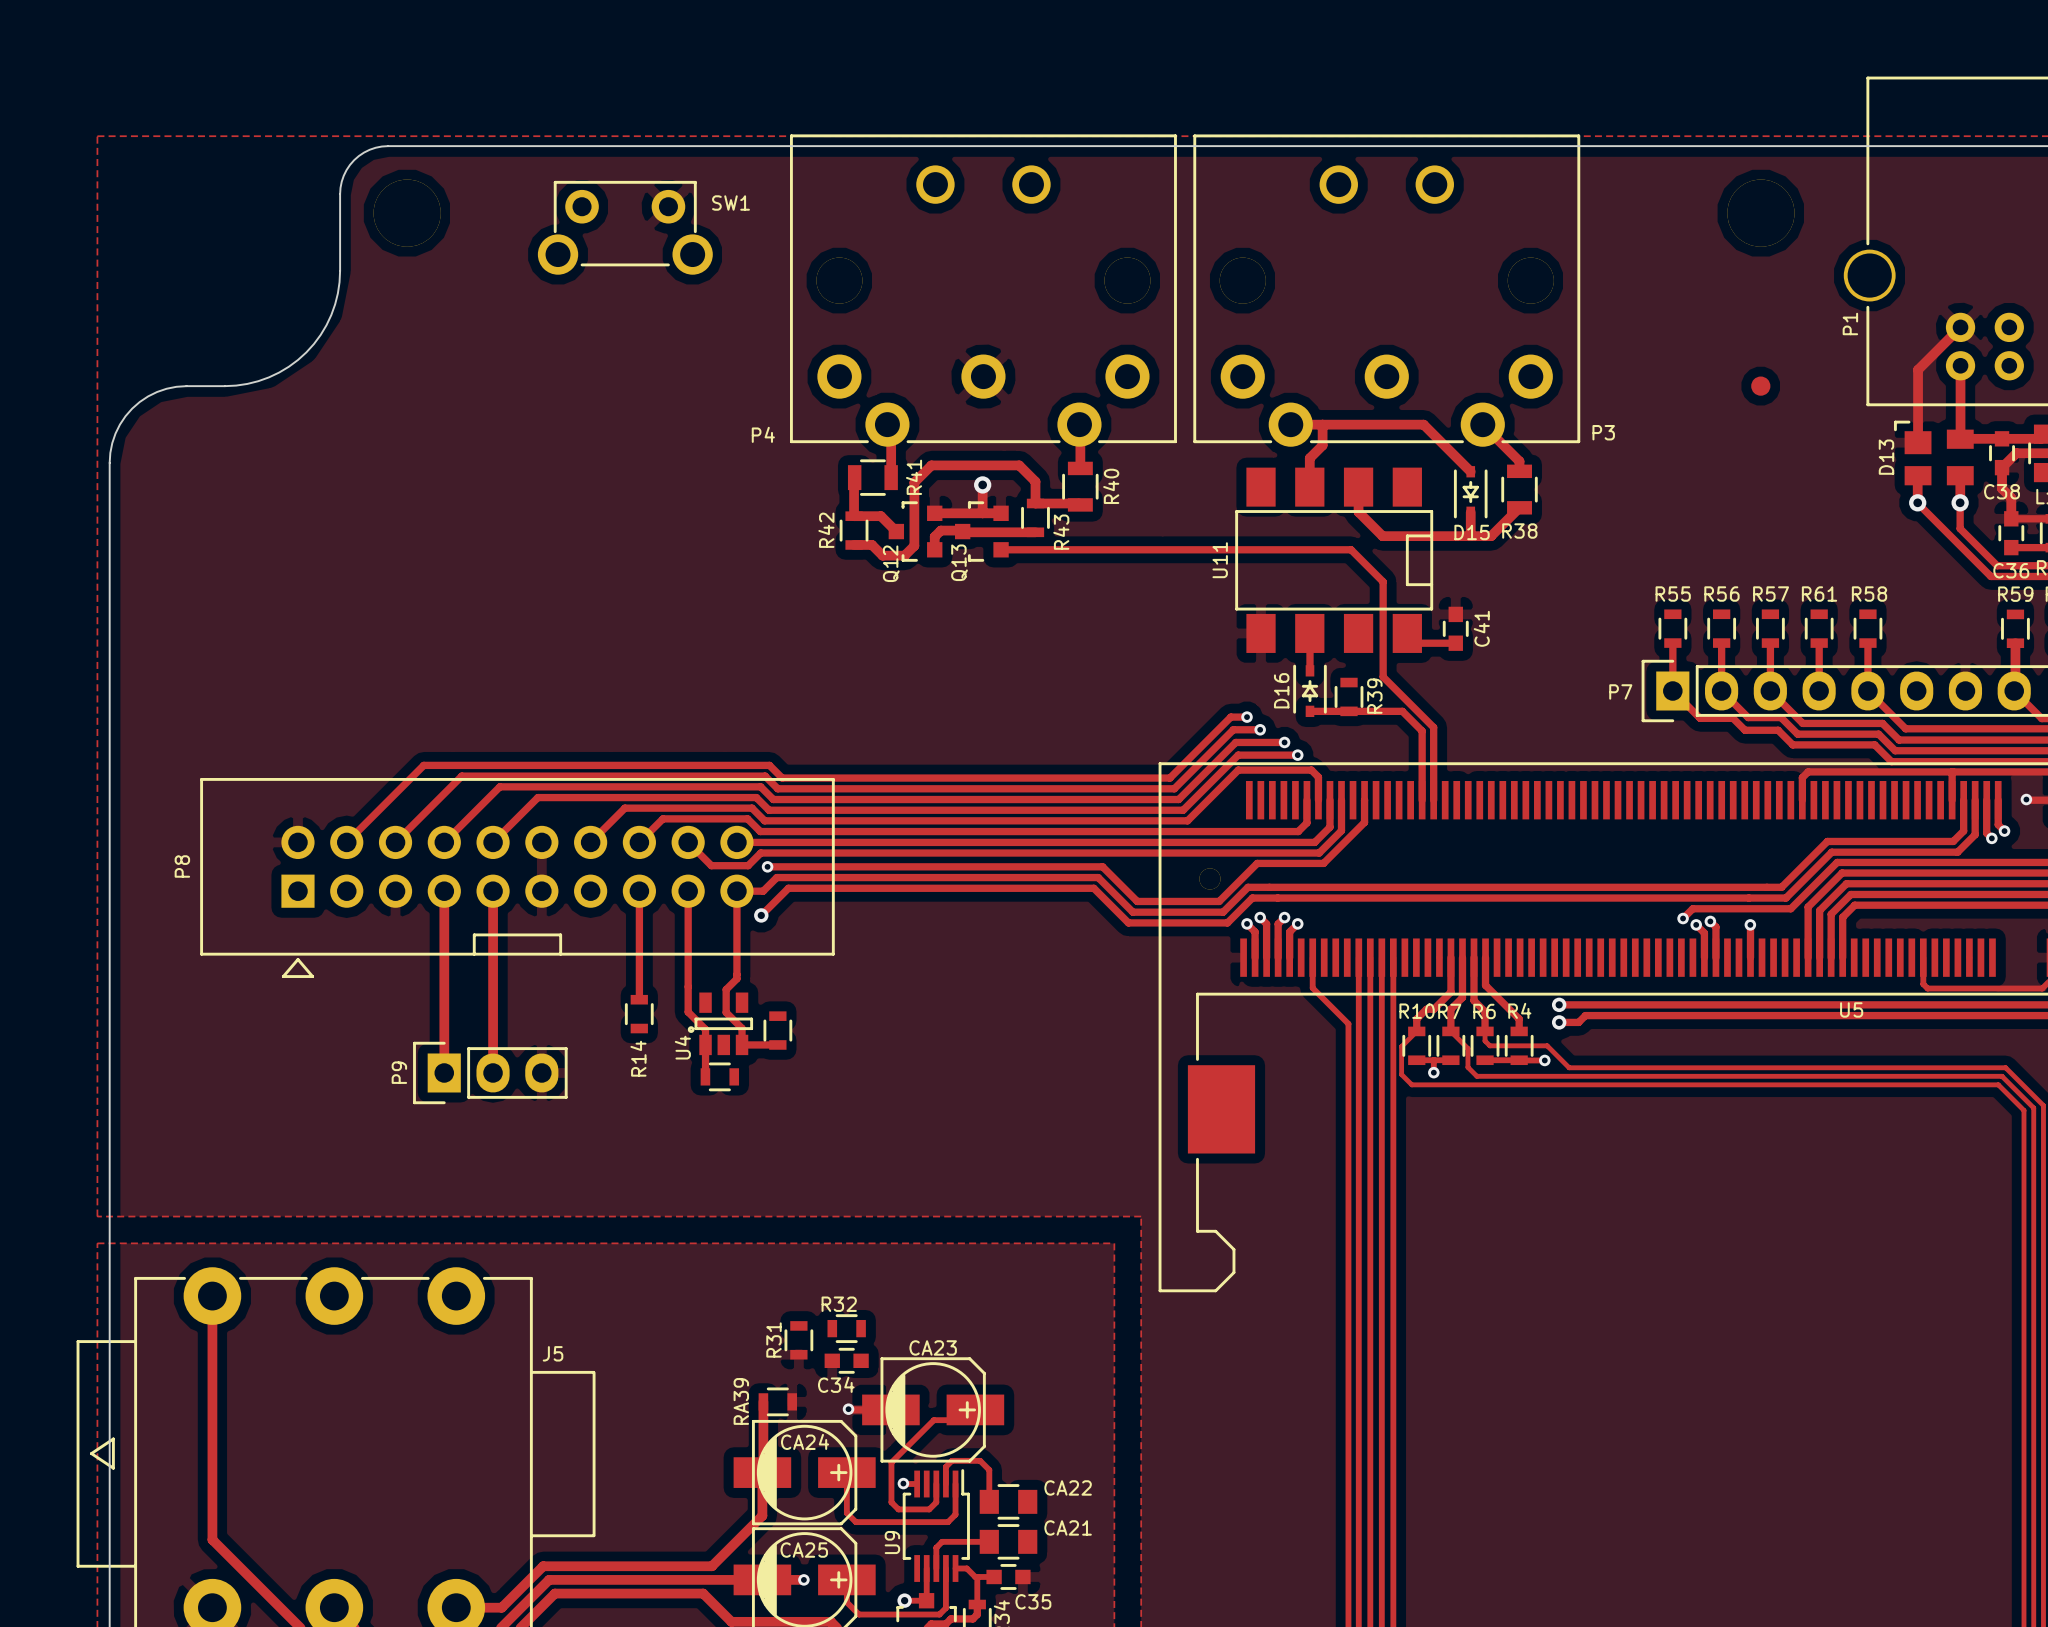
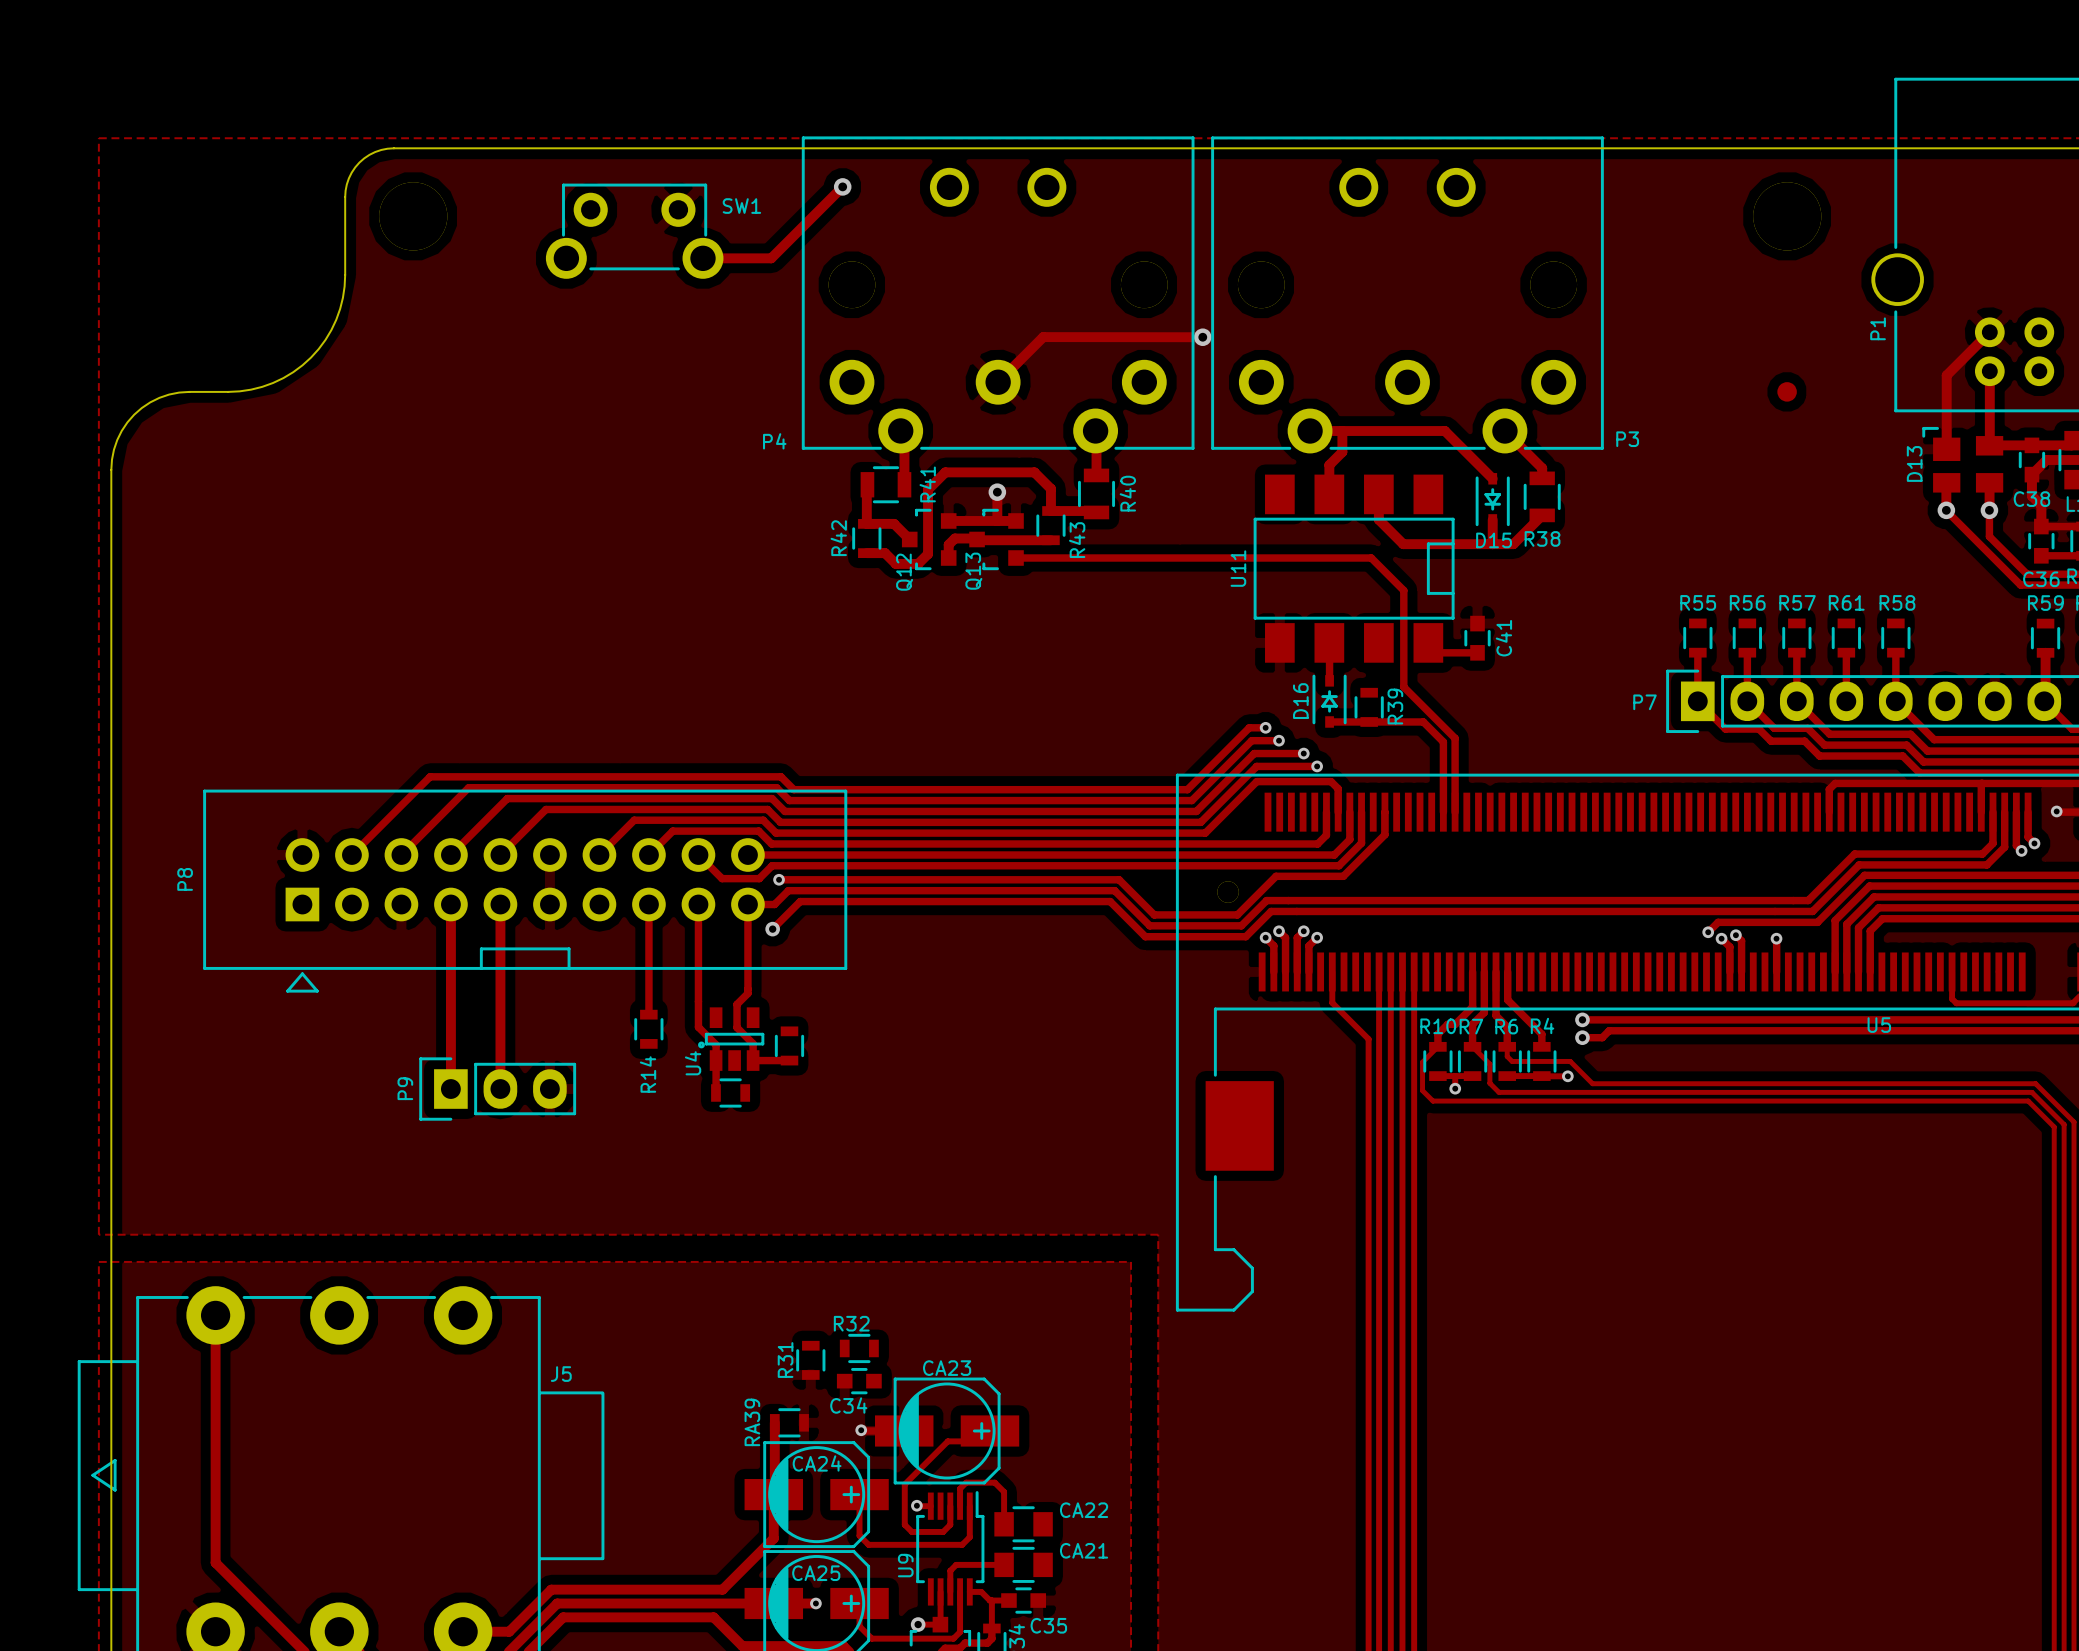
track: none -> (842, 186) (771, 258) (702, 258)
via: none -> (842, 186)
track: none -> (1202, 337) (1043, 337) (998, 382)
via: none -> (1202, 337)

